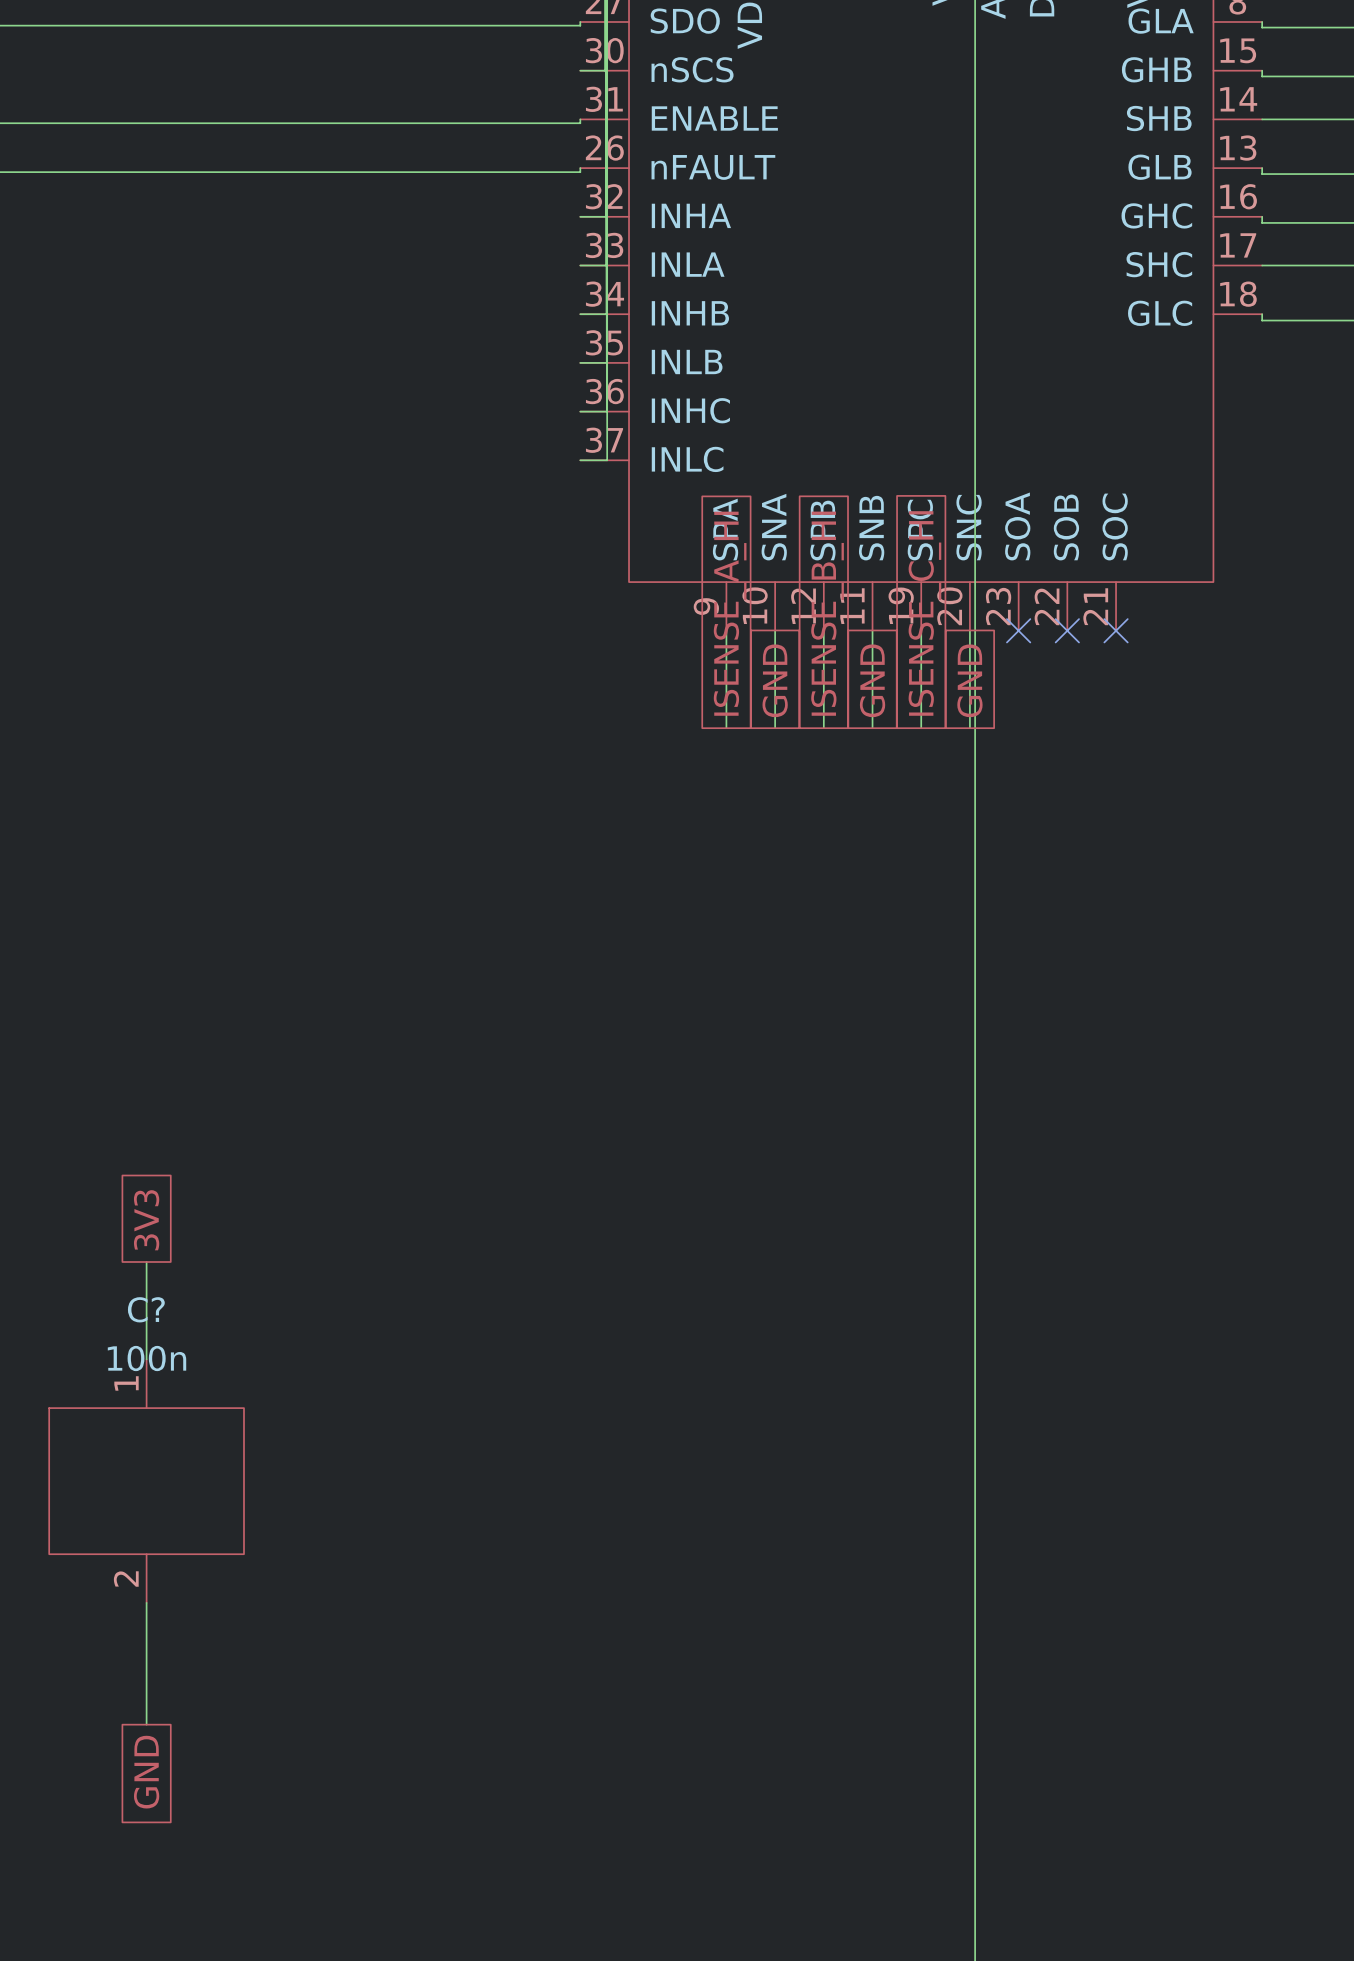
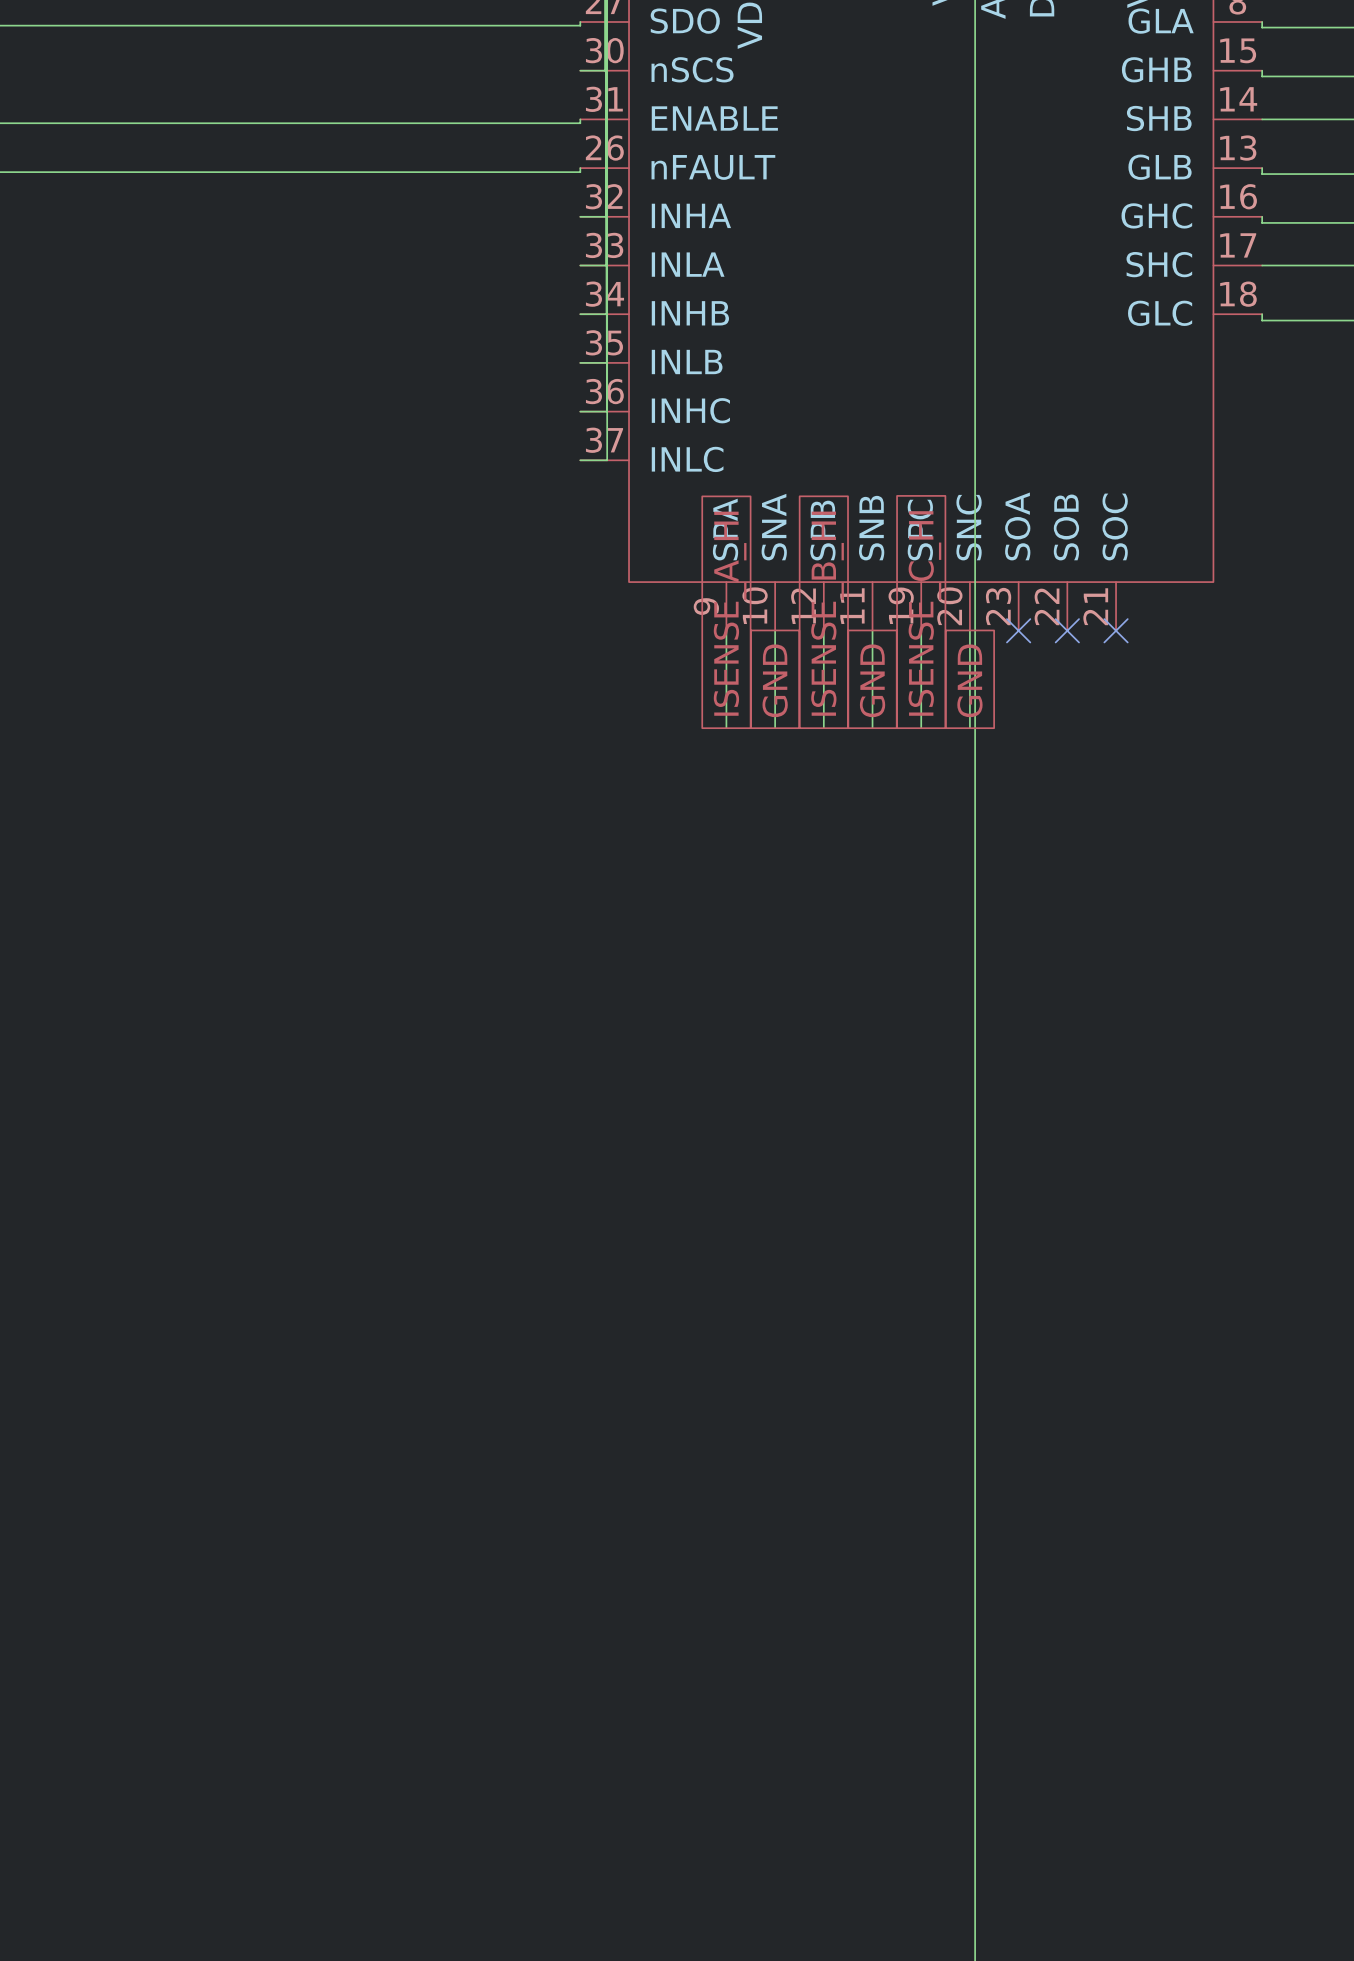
global label: 3V3 (146, 1220) -> none
wire: (146, 1261) (146, 1359) -> none
C?: 100n (146, 1481) -> none
wire: (146, 1602) (146, 1724) -> none
global label: GND (146, 1772) -> none

